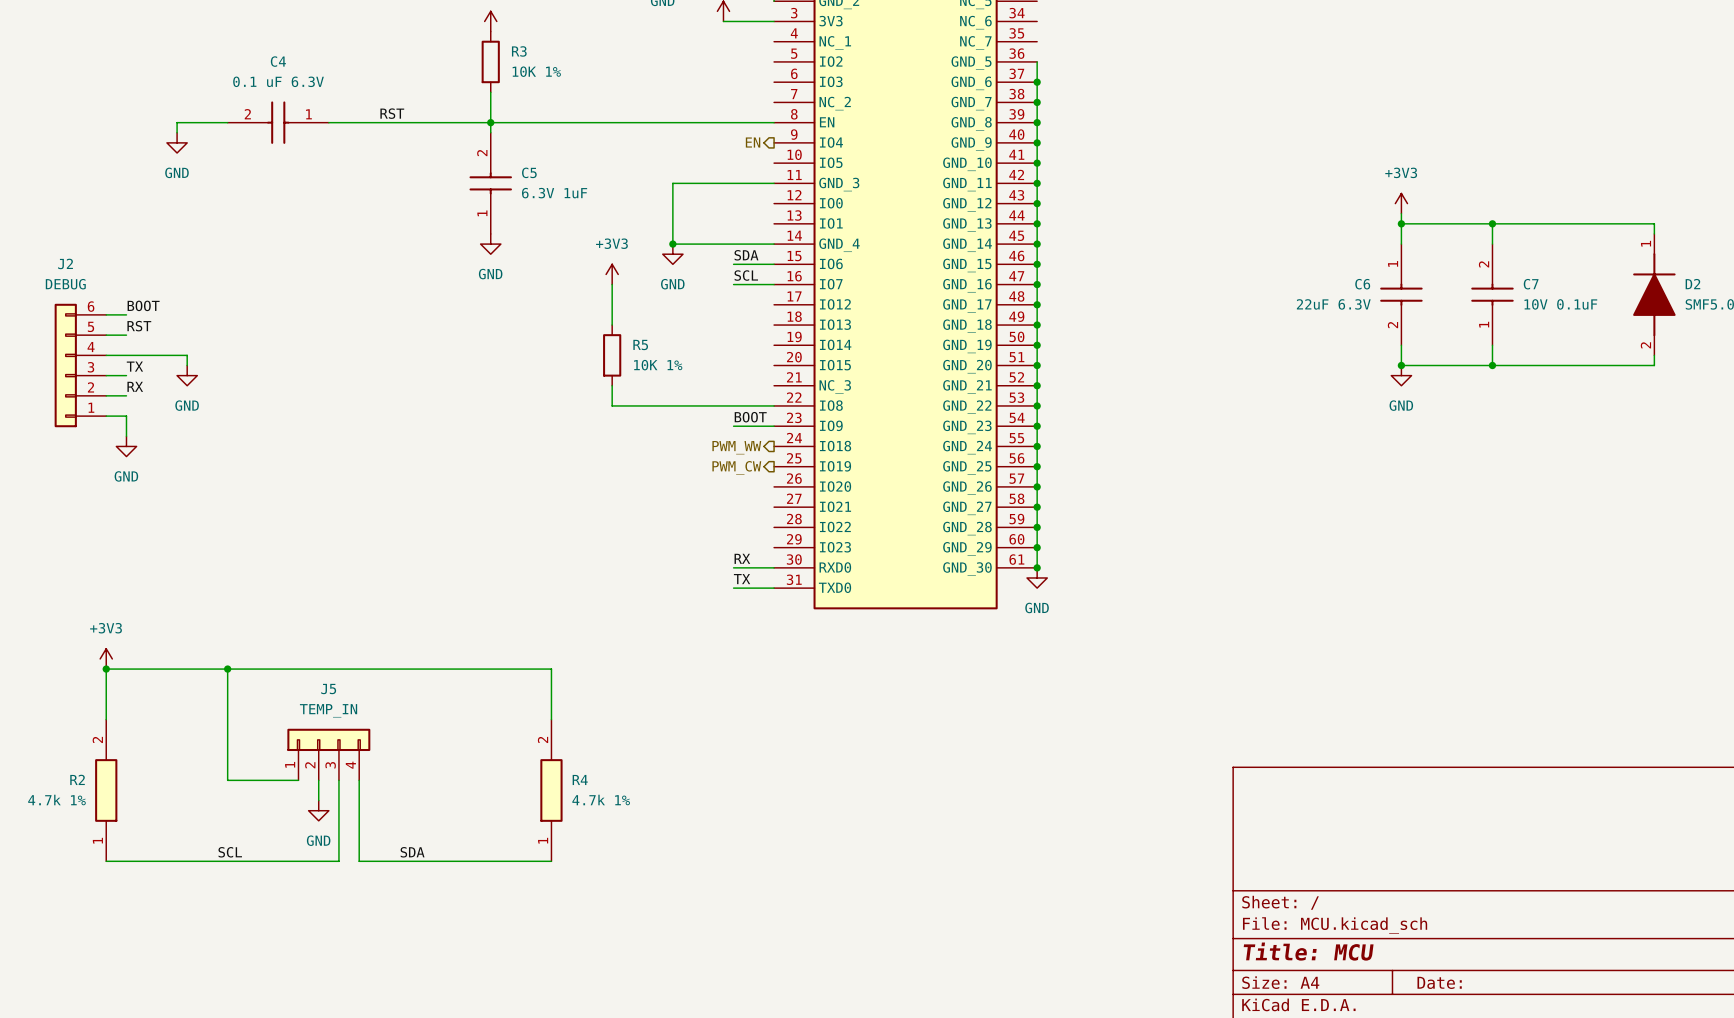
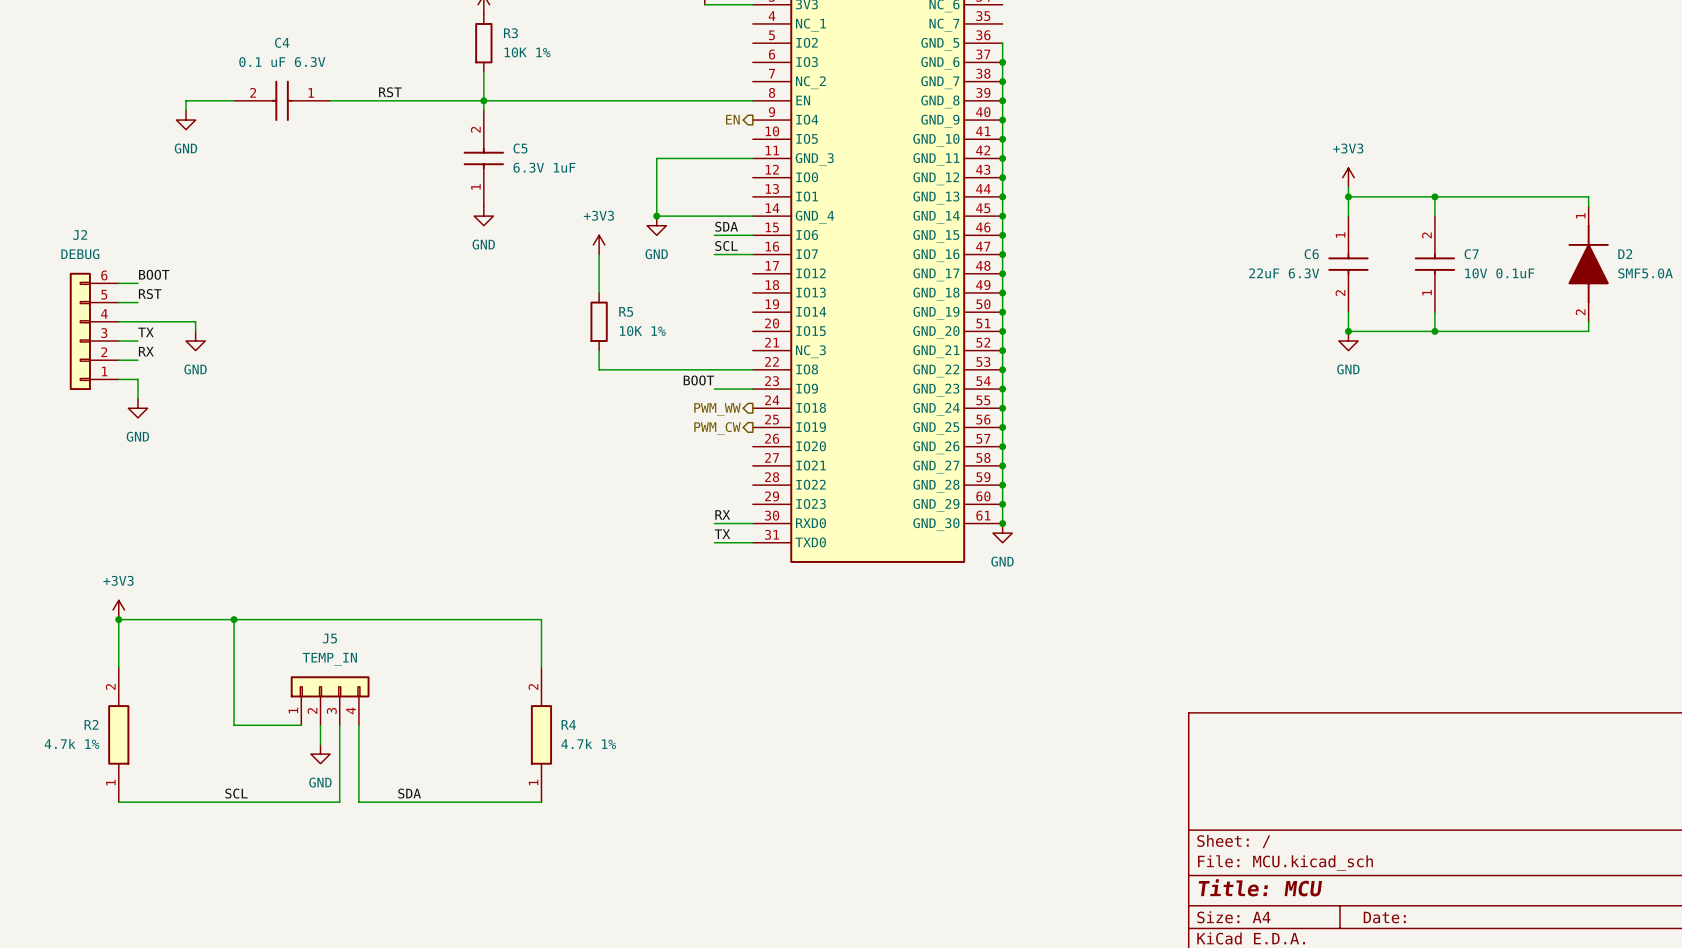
label position: BOOT (750, 417) -> BOOT (698, 380)

